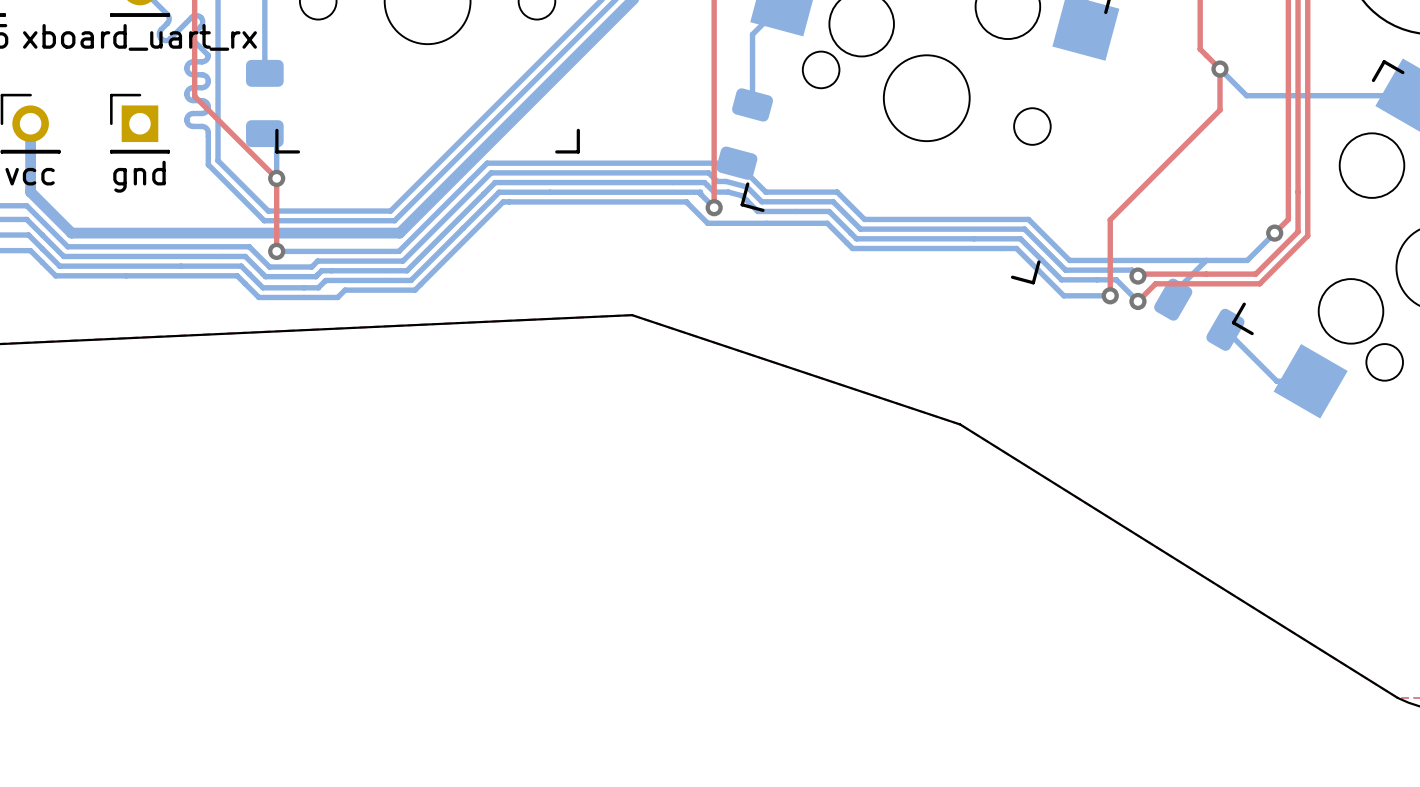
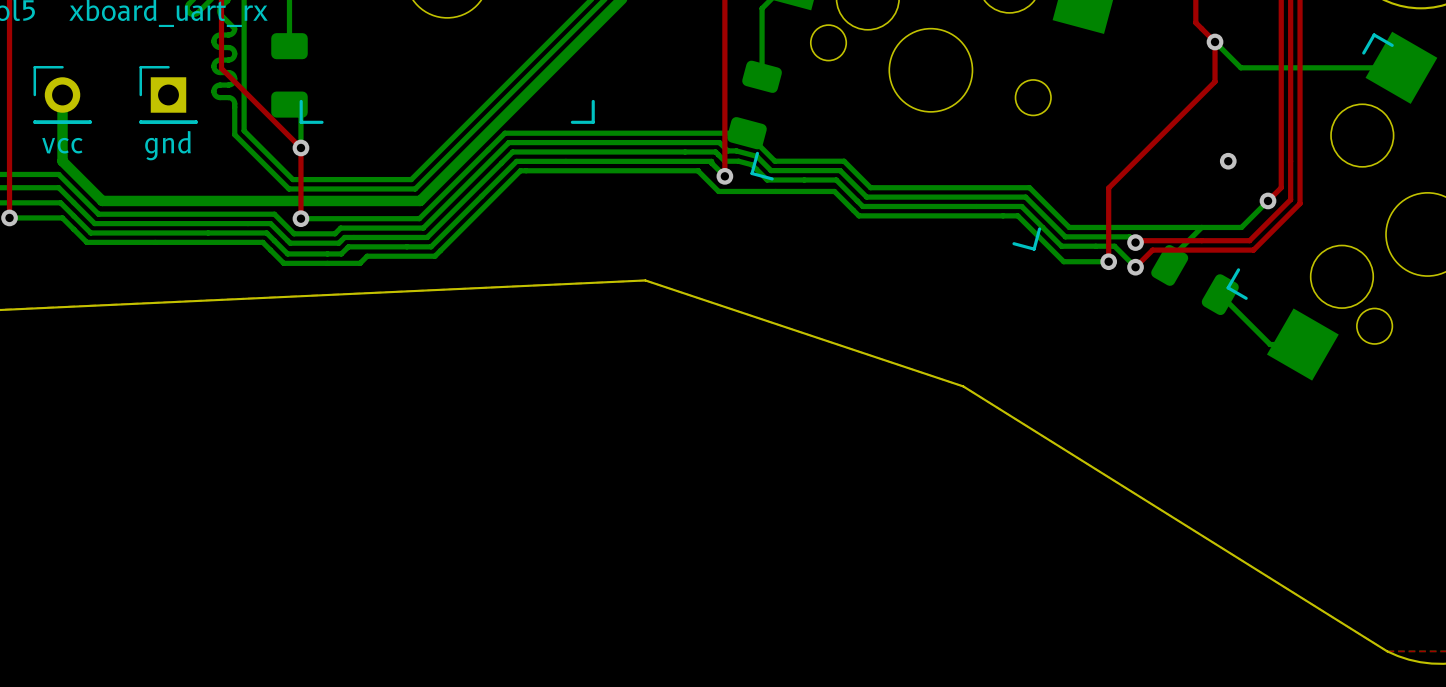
via: none -> (1228, 161)

